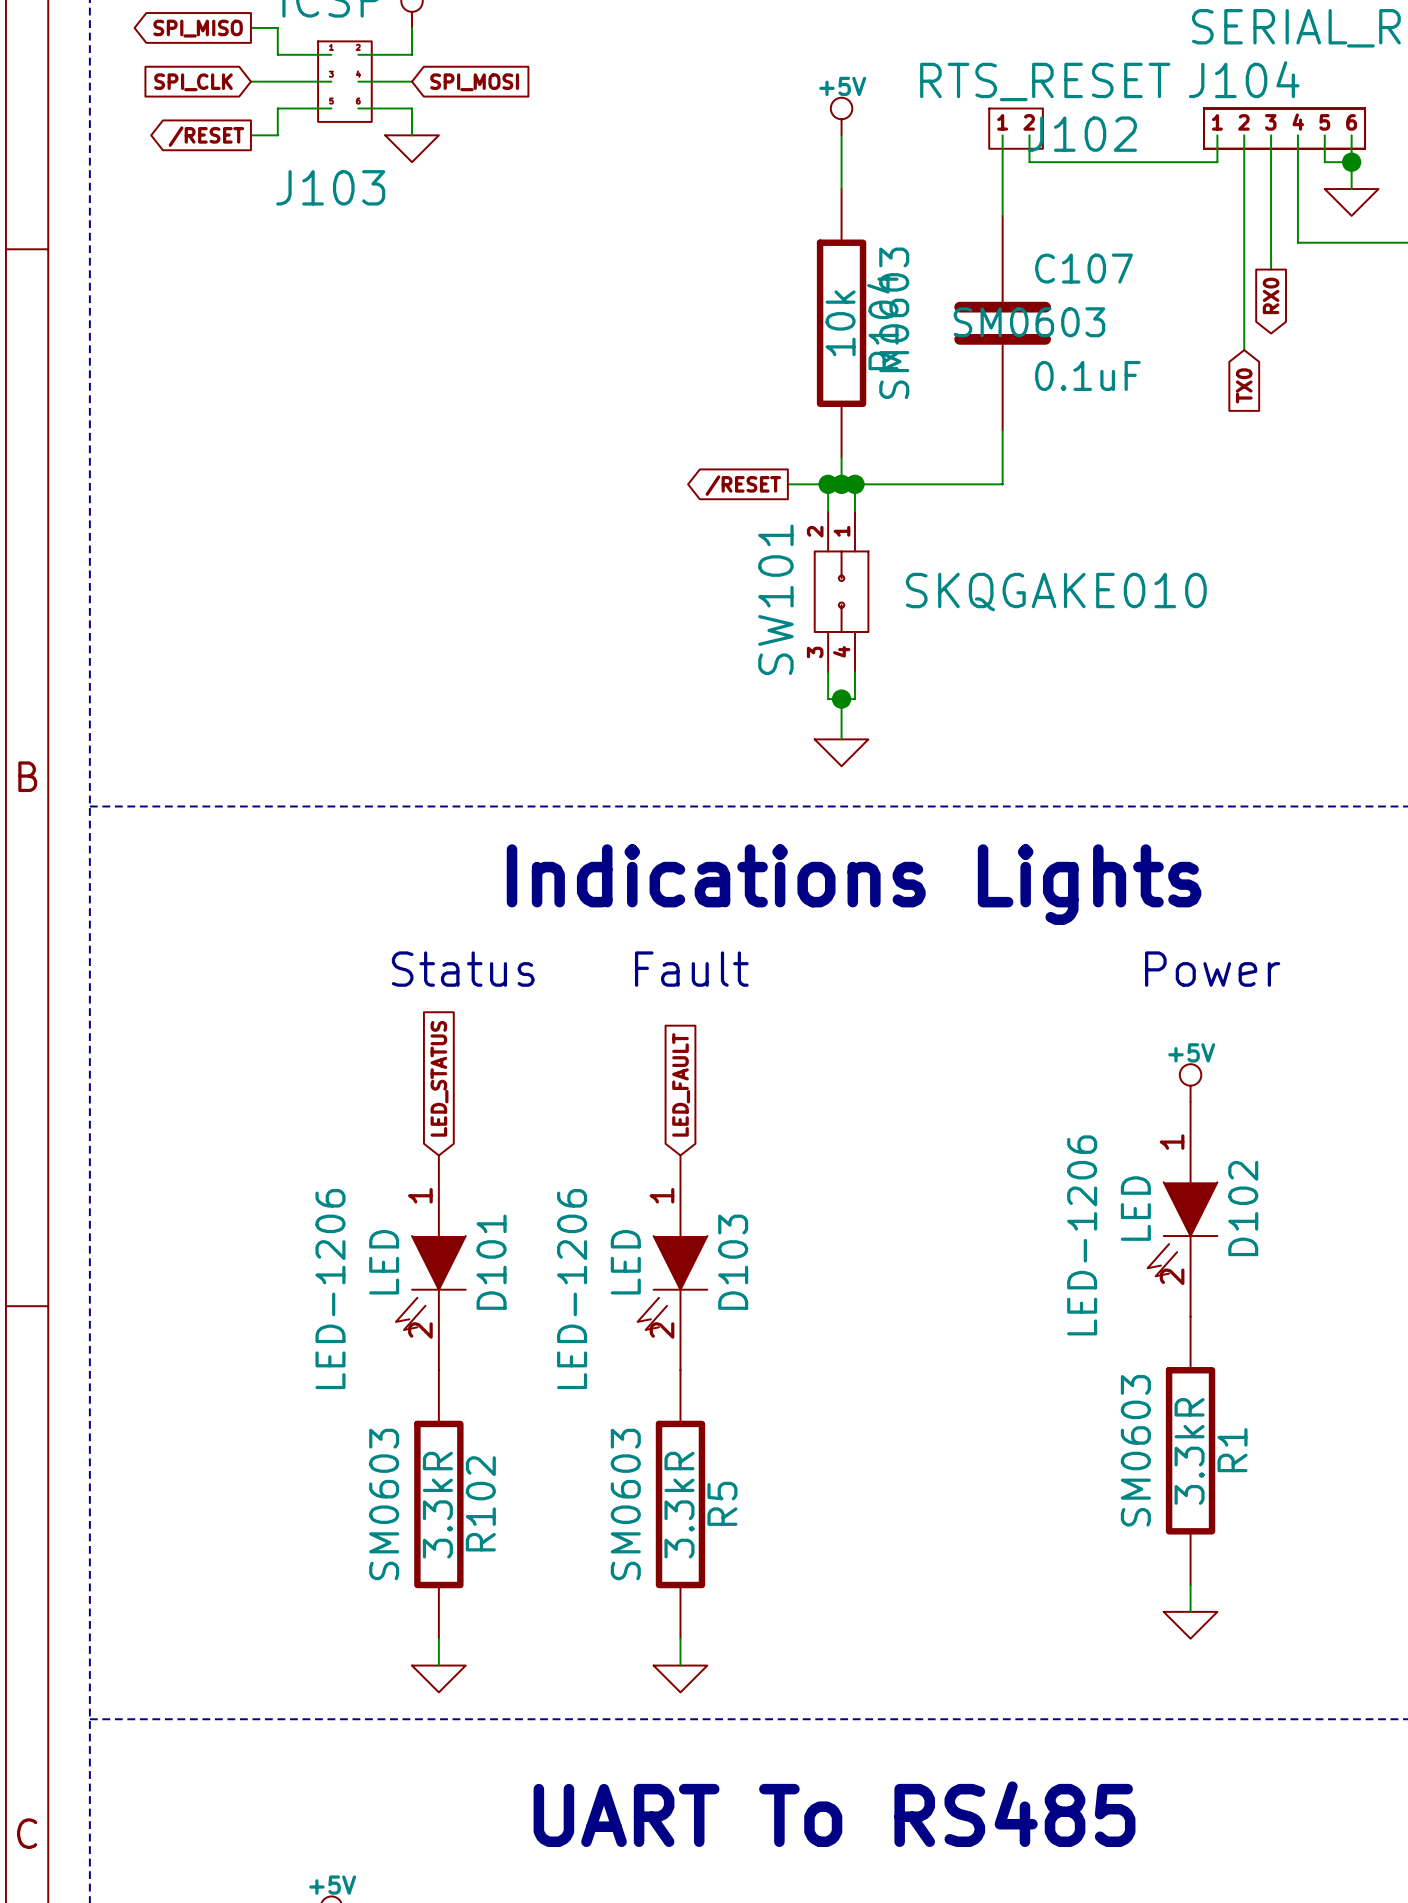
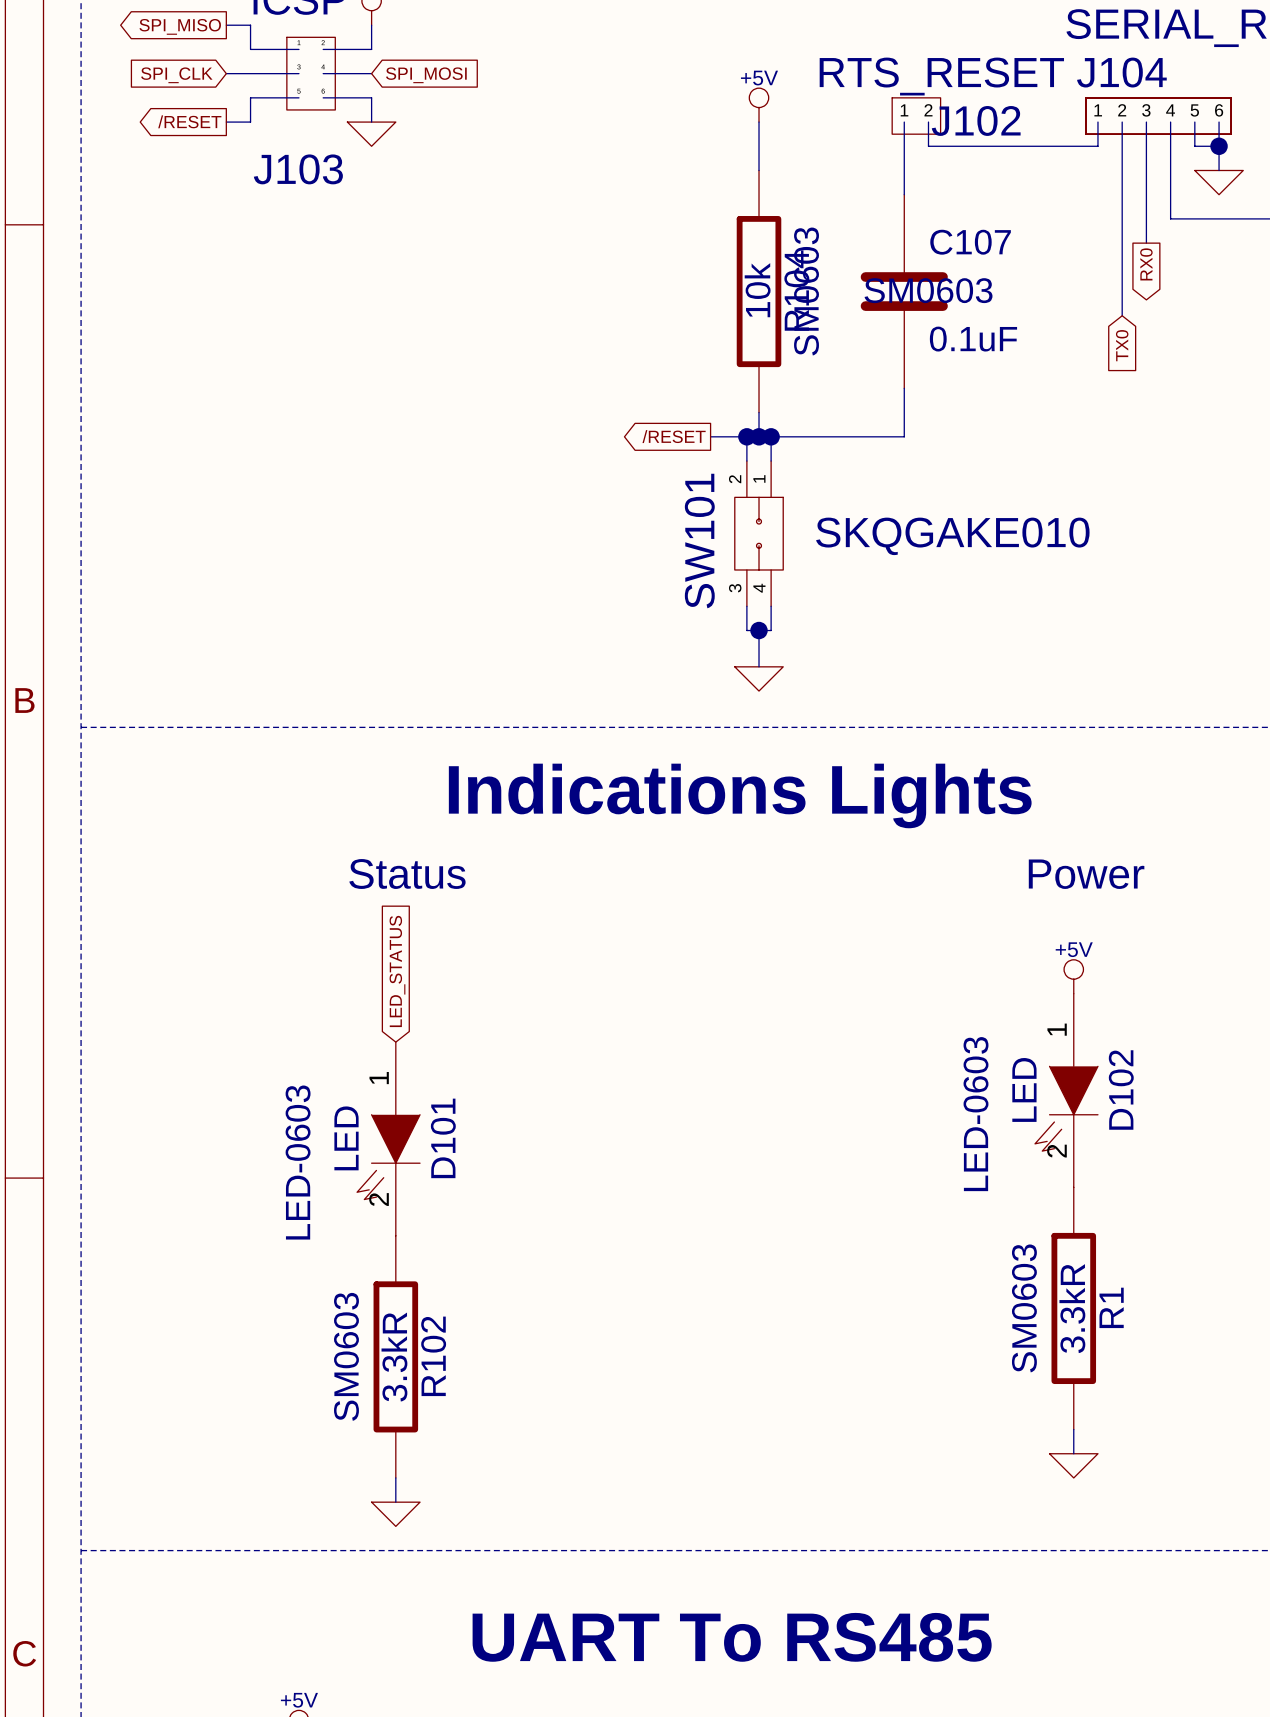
text: Fault (691, 969) -> none
global label: LED_FAULT (681, 1084) -> none
D102 text: LED-1206 (1082, 1235) -> LED-0603 (976, 1114)
D103: LED (672, 1262) -> none
D101 text: LED-1206 (330, 1289) -> LED-0603 (298, 1162)
R5: 3.3kR (680, 1504) -> none
wire: (680, 1638) (680, 1665) -> none
power symbol: (680, 1678) -> none

